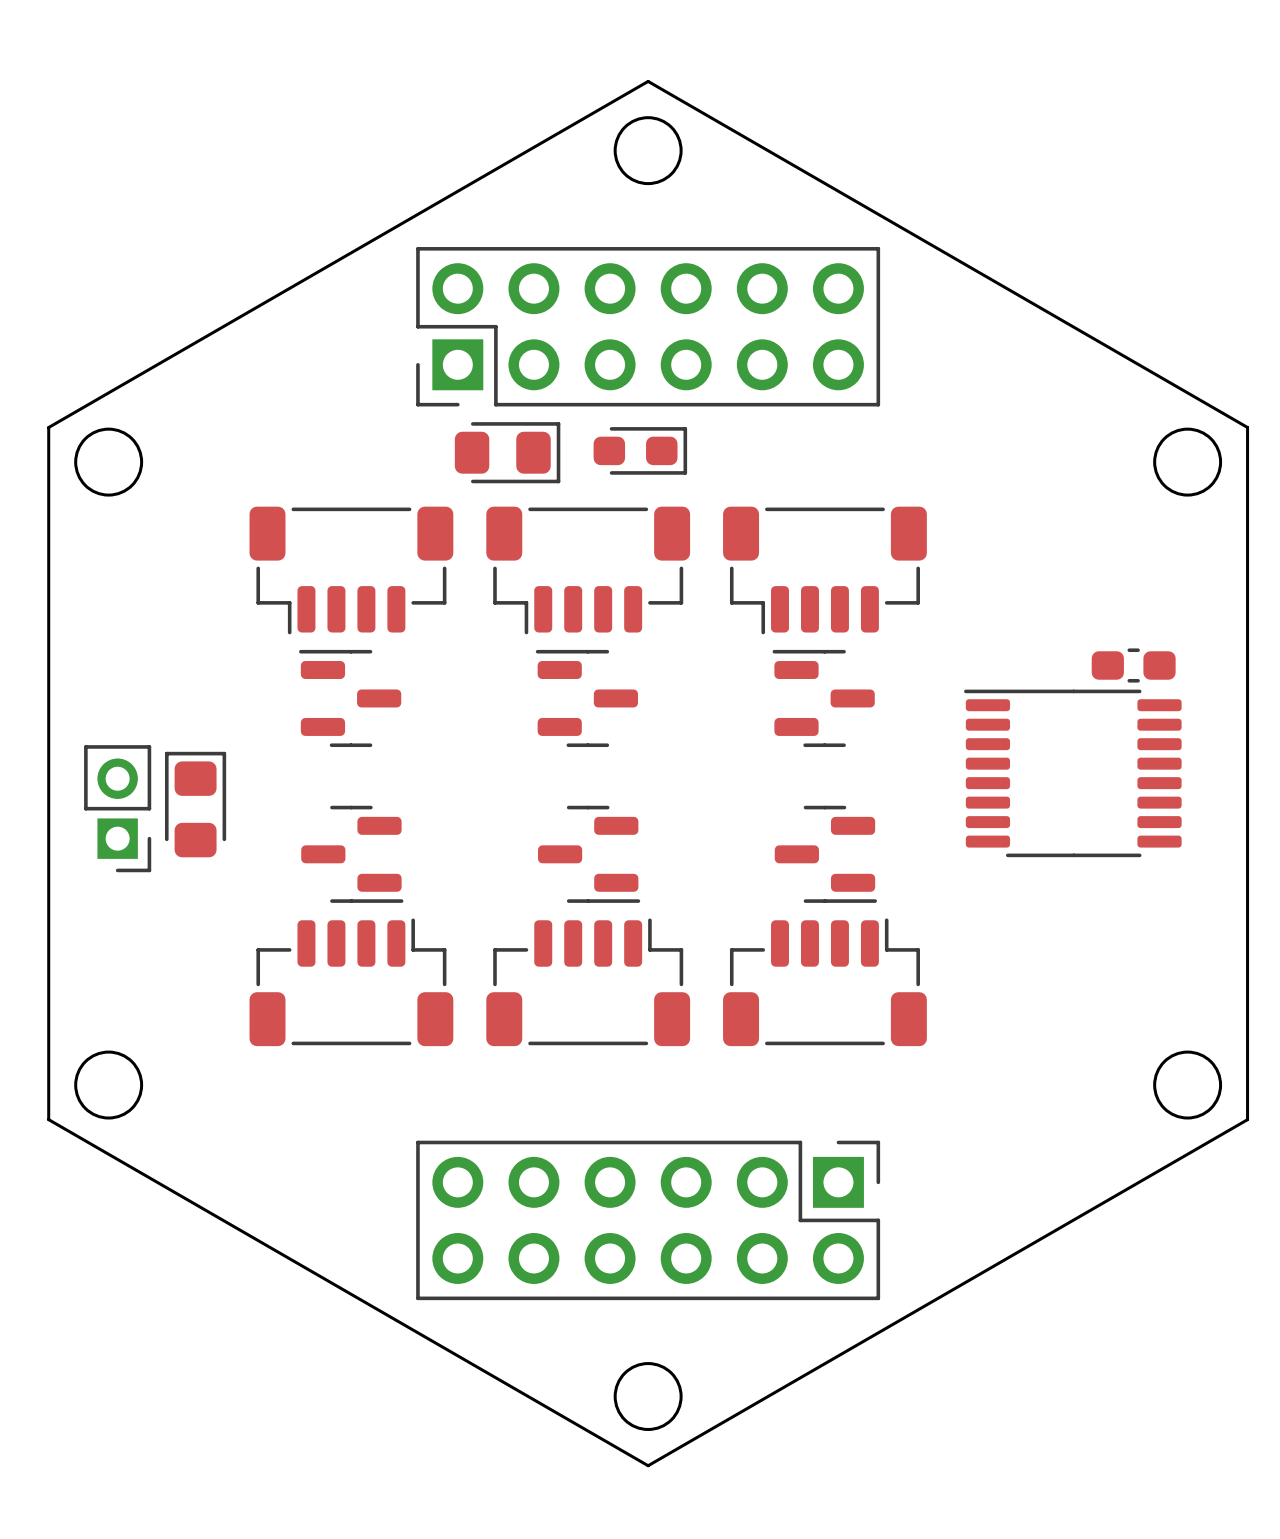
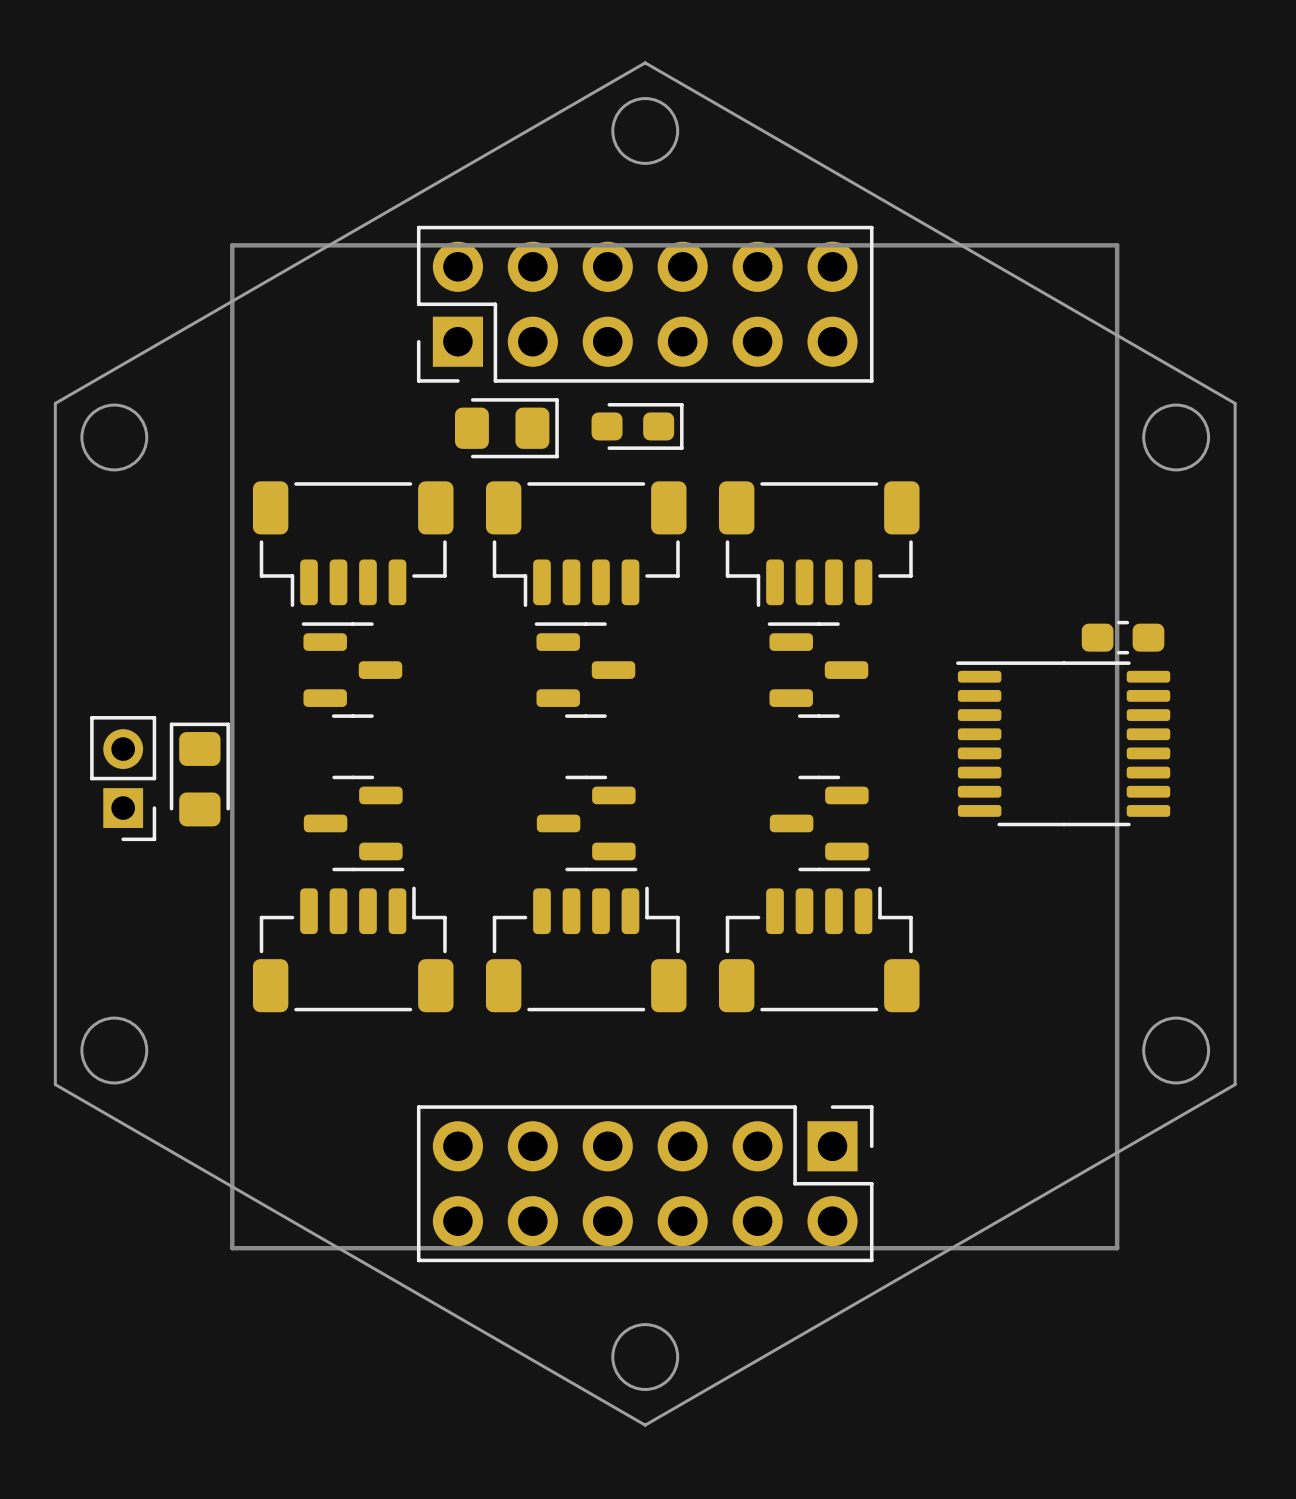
line: none -> (232, 245) (1117, 245) (1117, 1248) (232, 1248) (232, 245)

